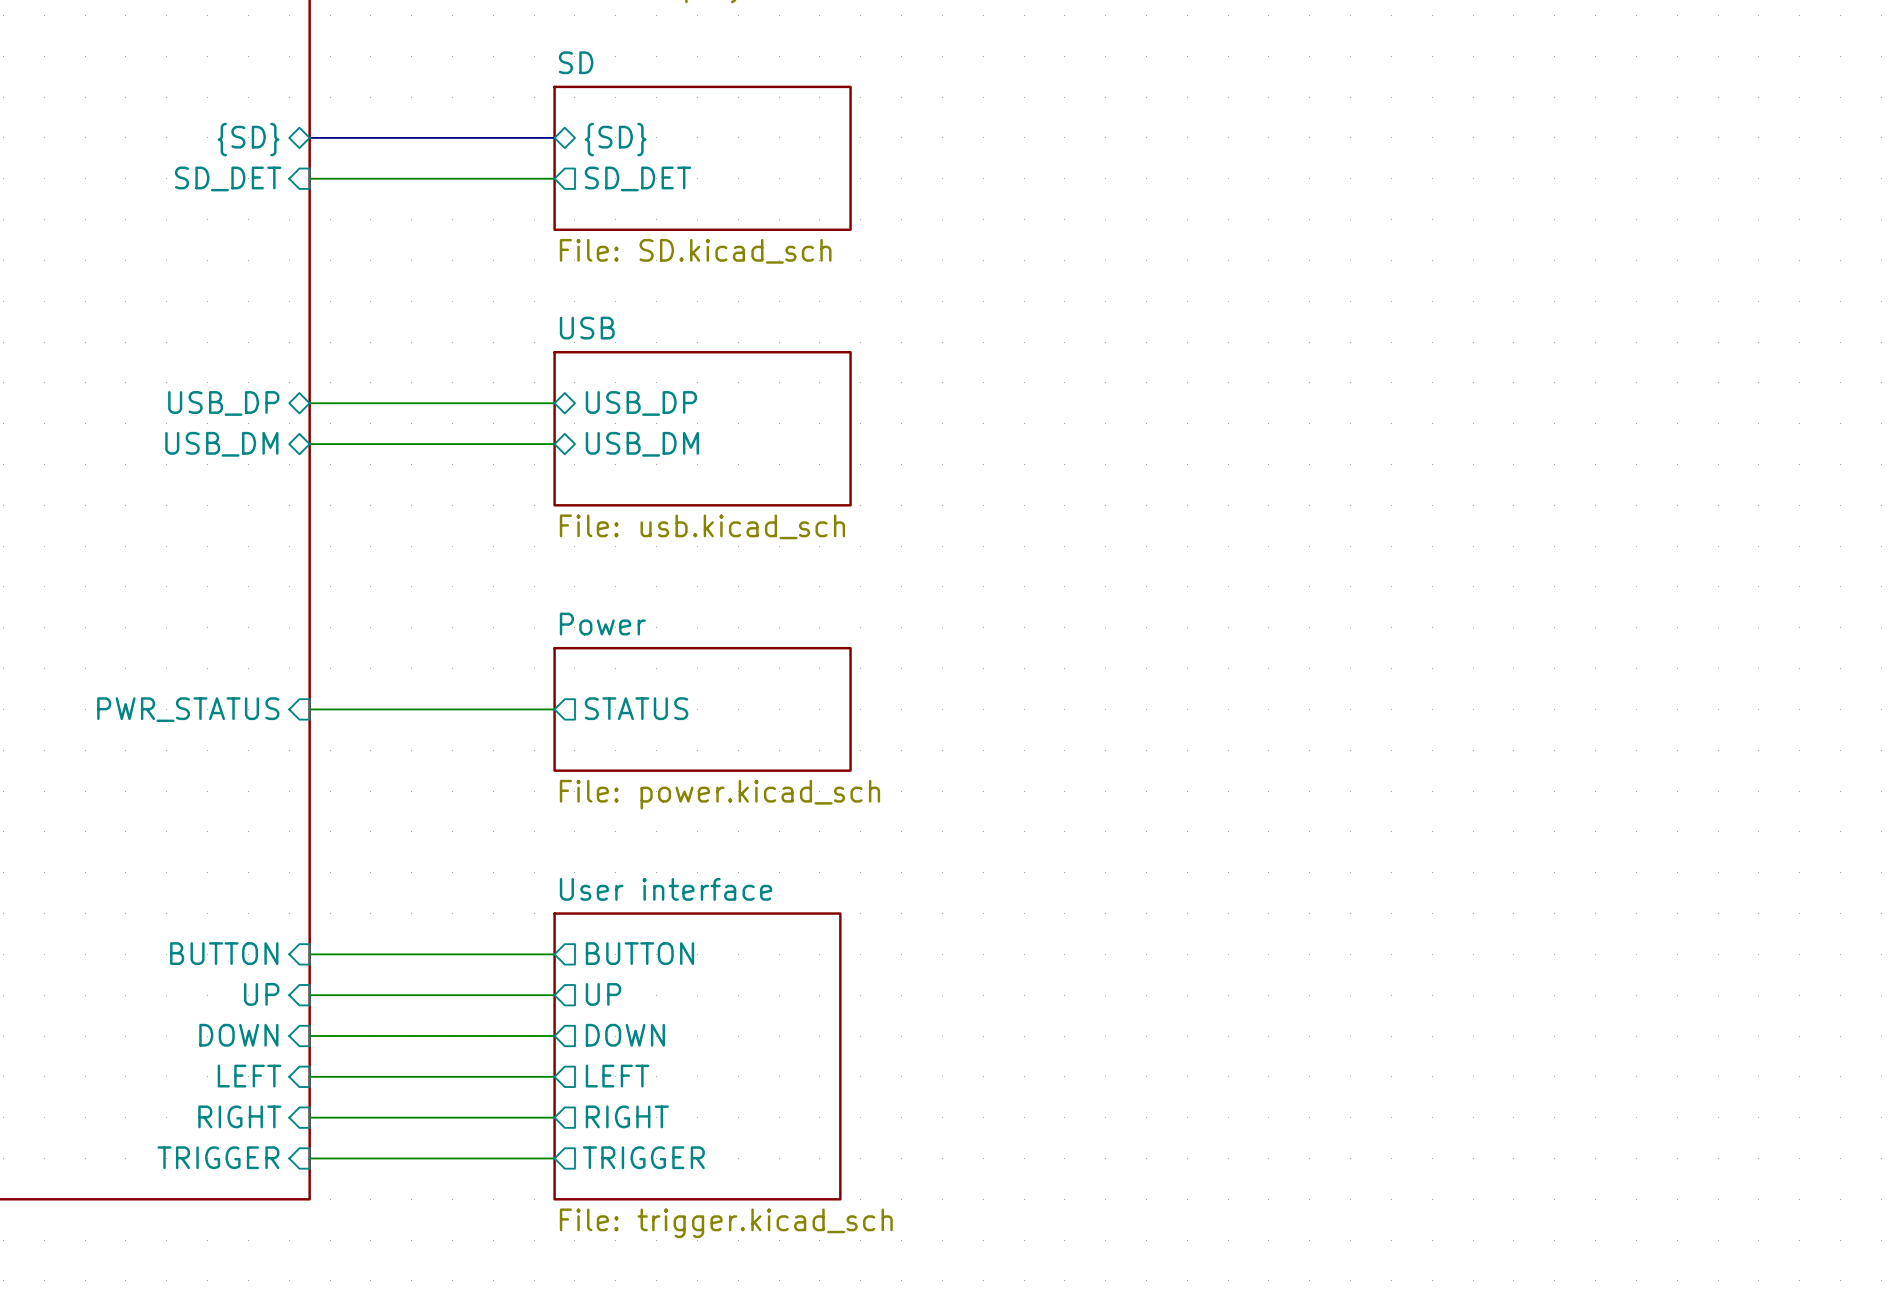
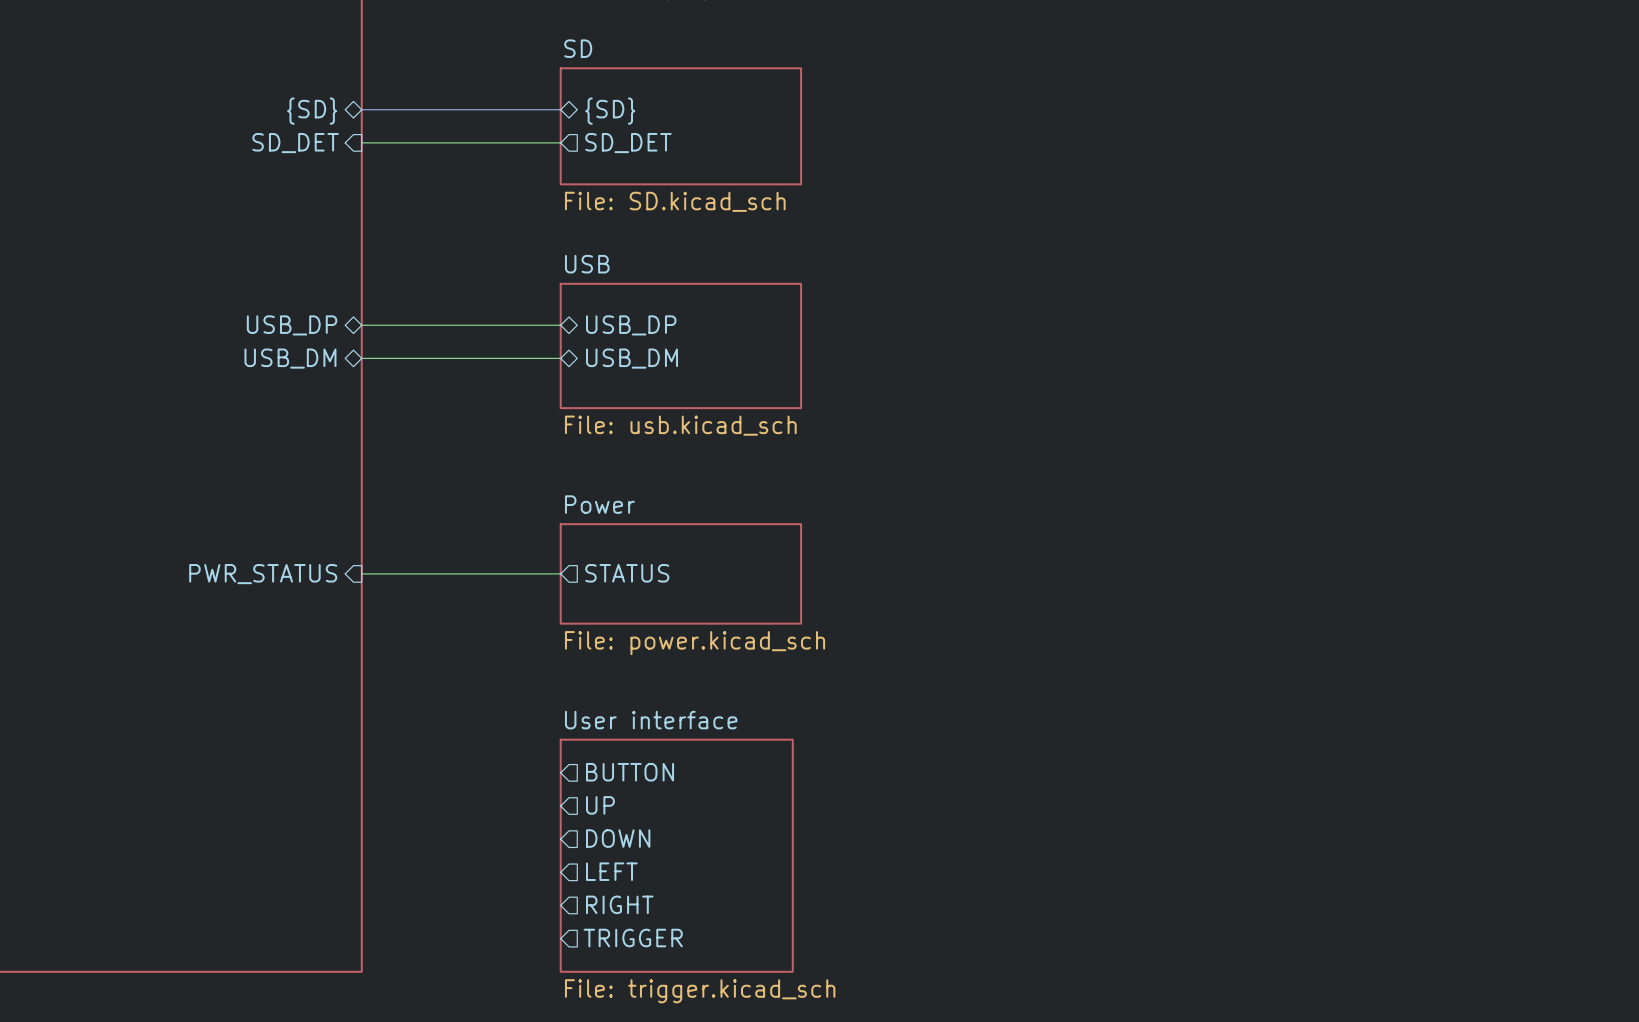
sheet pin: BUTTON (224, 953) -> none
wire: (309, 954) (554, 954) -> none
sheet pin: UP (261, 994) -> none
wire: (309, 995) (554, 995) -> none
sheet pin: DOWN (238, 1035) -> none
wire: (309, 1036) (554, 1036) -> none
sheet pin: LEFT (249, 1076) -> none
wire: (309, 1076) (554, 1076) -> none
sheet pin: RIGHT (239, 1116) -> none
wire: (309, 1117) (554, 1117) -> none
sheet pin: TRIGGER (218, 1157) -> none
wire: (309, 1158) (554, 1158) -> none

